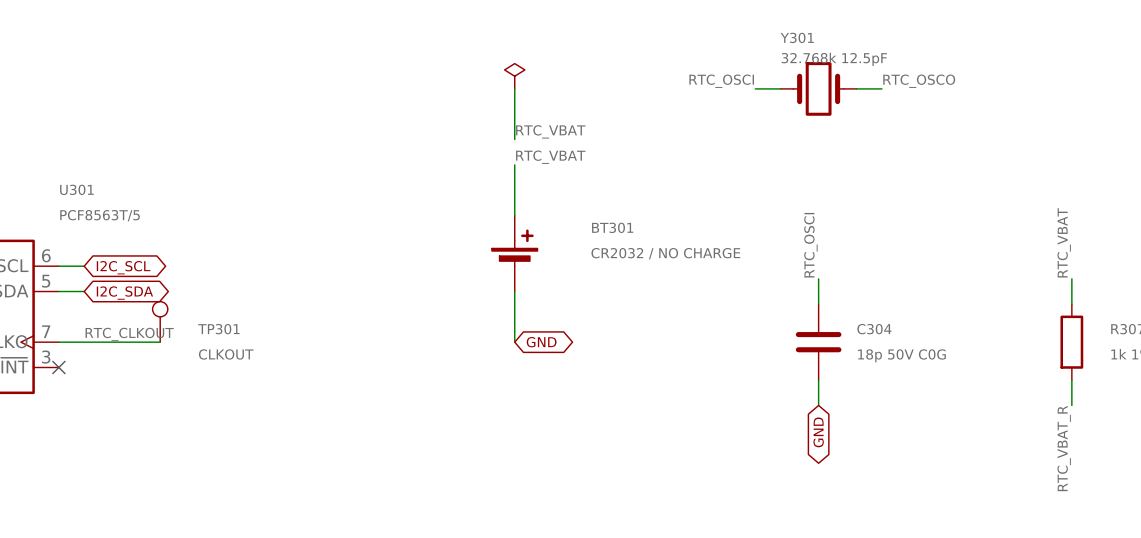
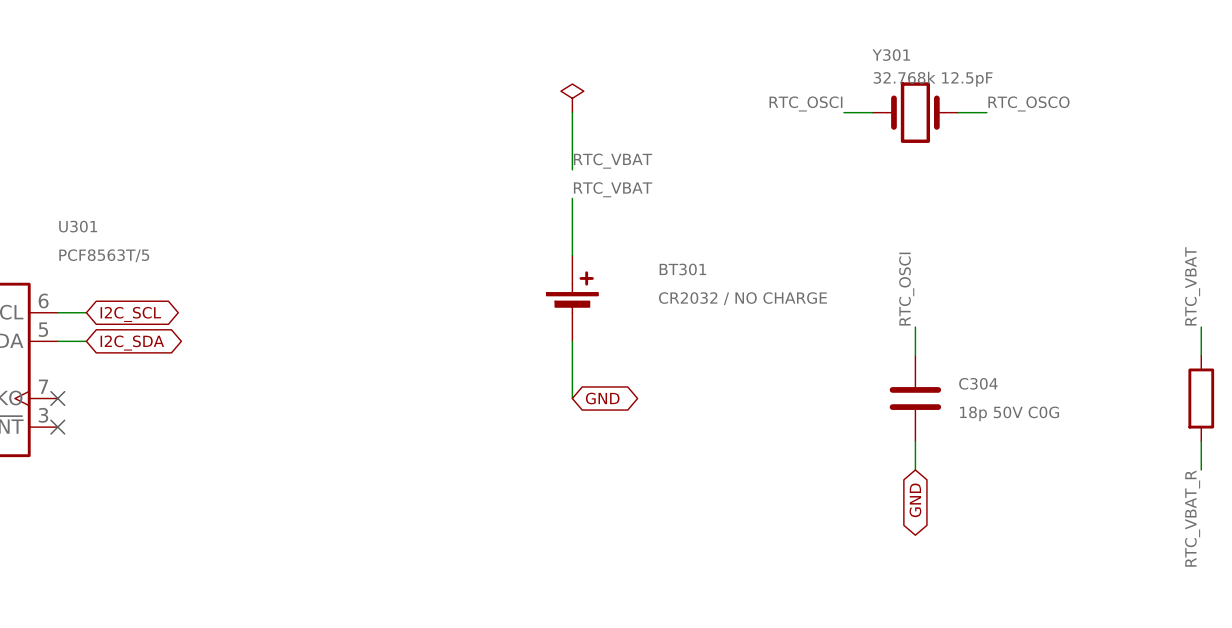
TP301: CLKOUT (160, 321) -> none
label: RTC_CLKOUT (129, 334) -> none
wire: (58, 342) (160, 342) -> none
no-connect mark: none -> (57, 398)

